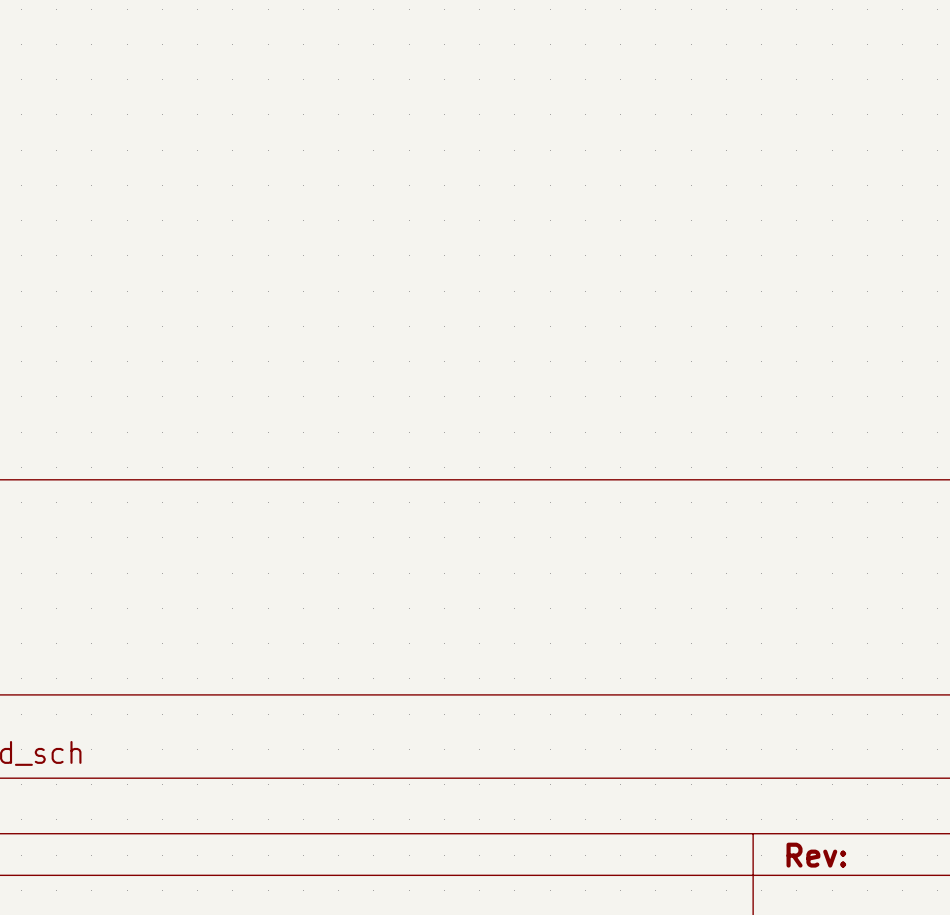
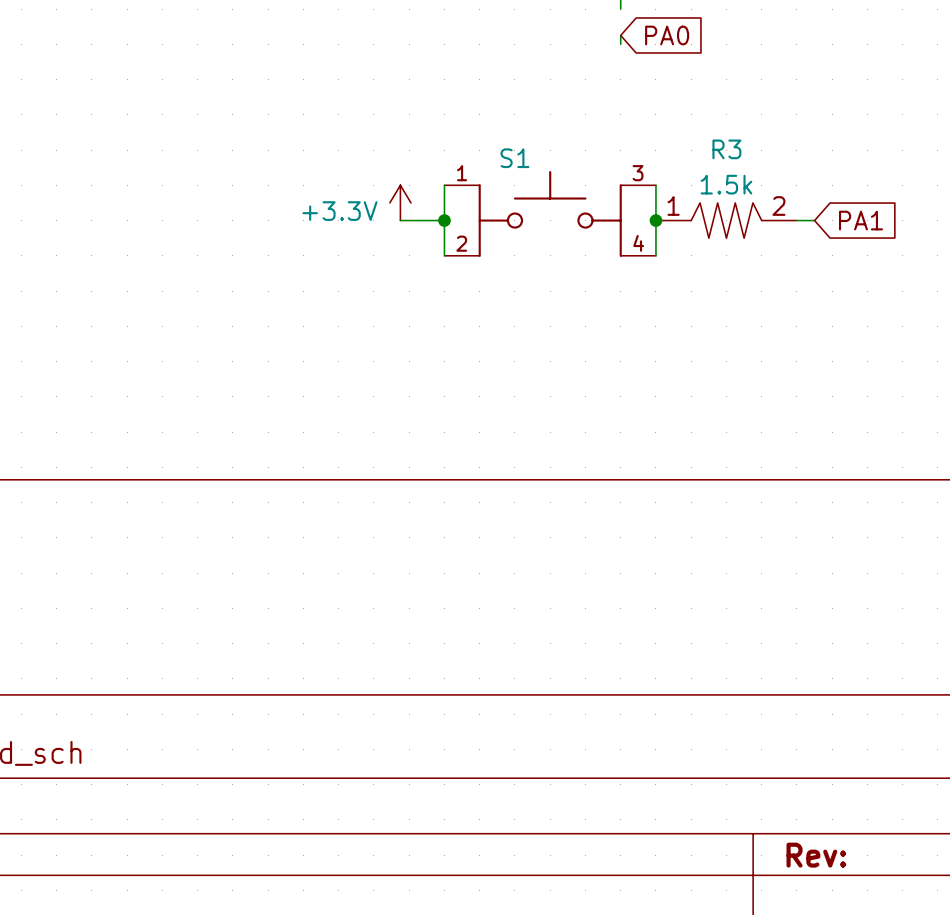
wire: none -> (620, 0) (620, 9)
wire: none -> (620, 35) (620, 44)
global label: none -> PA0 (667, 35)
wire: none -> (444, 185) (444, 255)
wire: none -> (655, 185) (655, 255)
power symbol: none -> +3.3V (400, 202)
S1: none -> (550, 213)
wire: none -> (400, 220) (444, 220)
junction: none -> (444, 220)
junction: none -> (655, 220)
R3: none -> 1.5k (726, 220)
wire: none -> (796, 220) (814, 220)
global label: none -> PA1 (861, 220)

